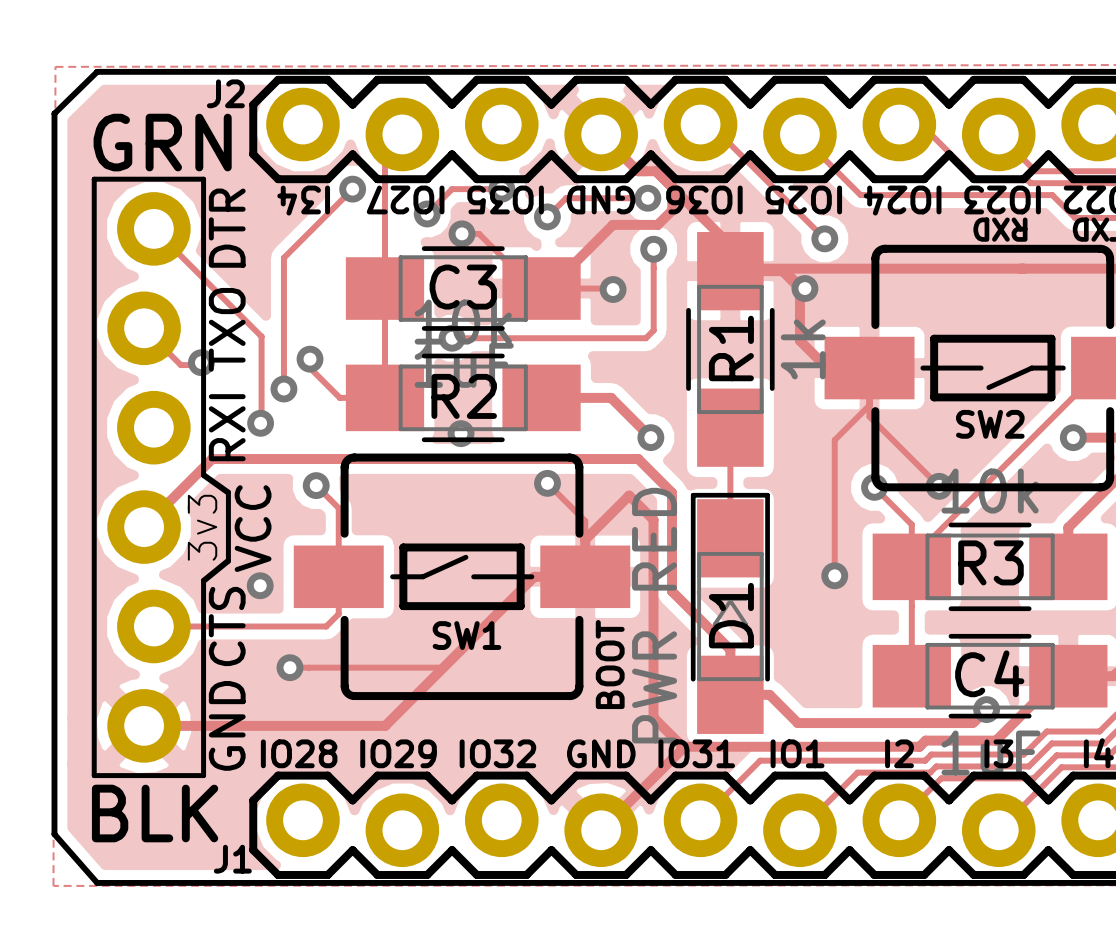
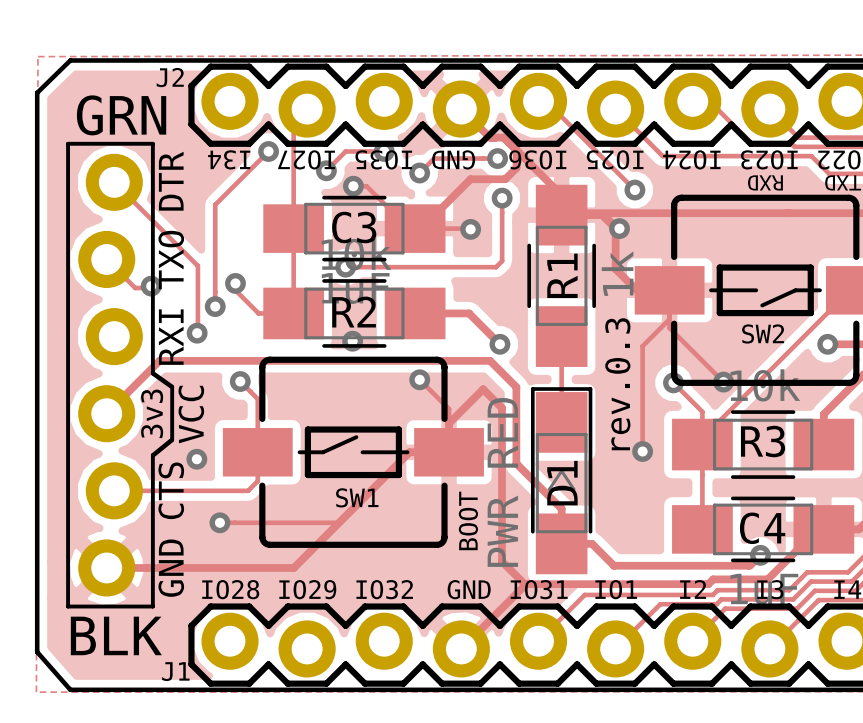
text: none -> rev.0.3 (617, 384)

